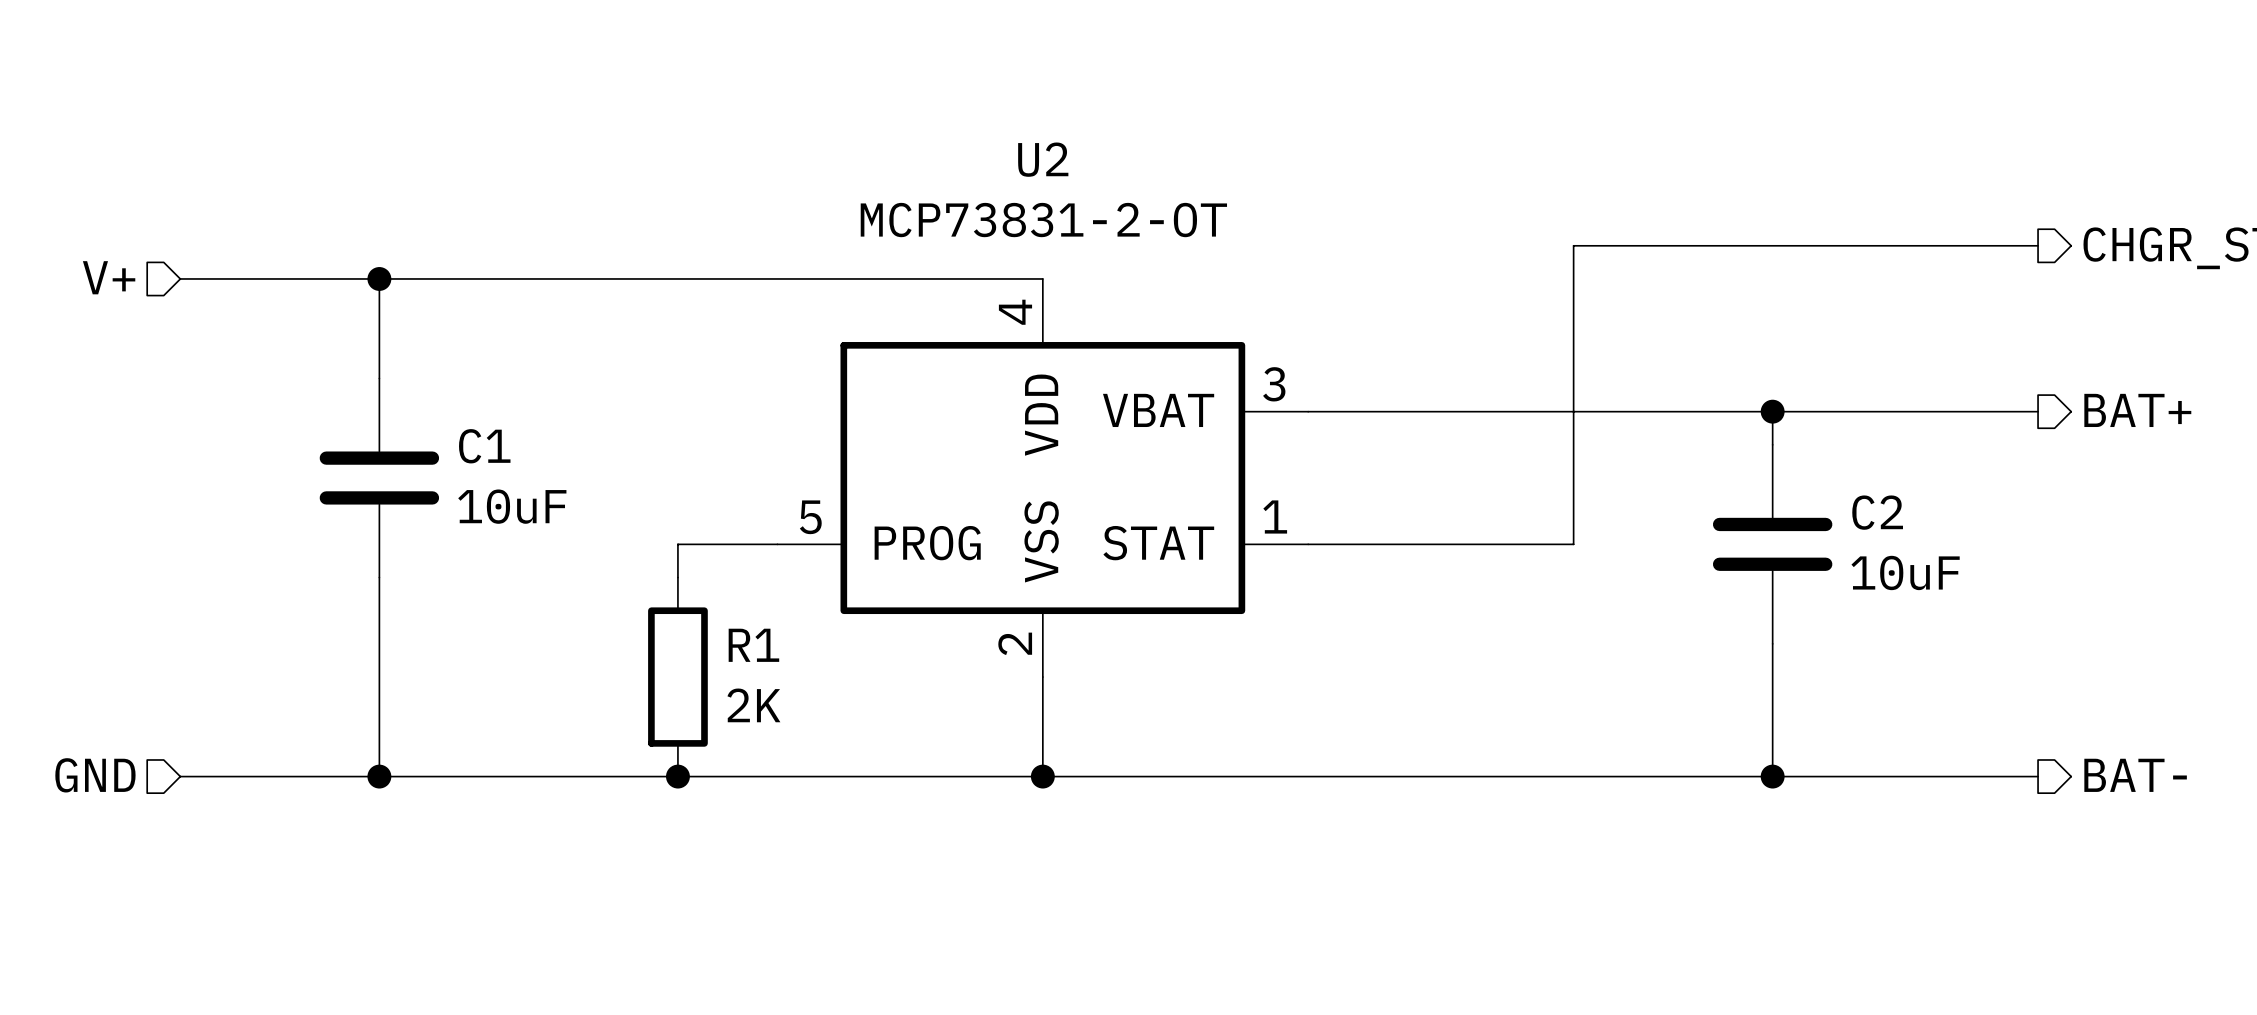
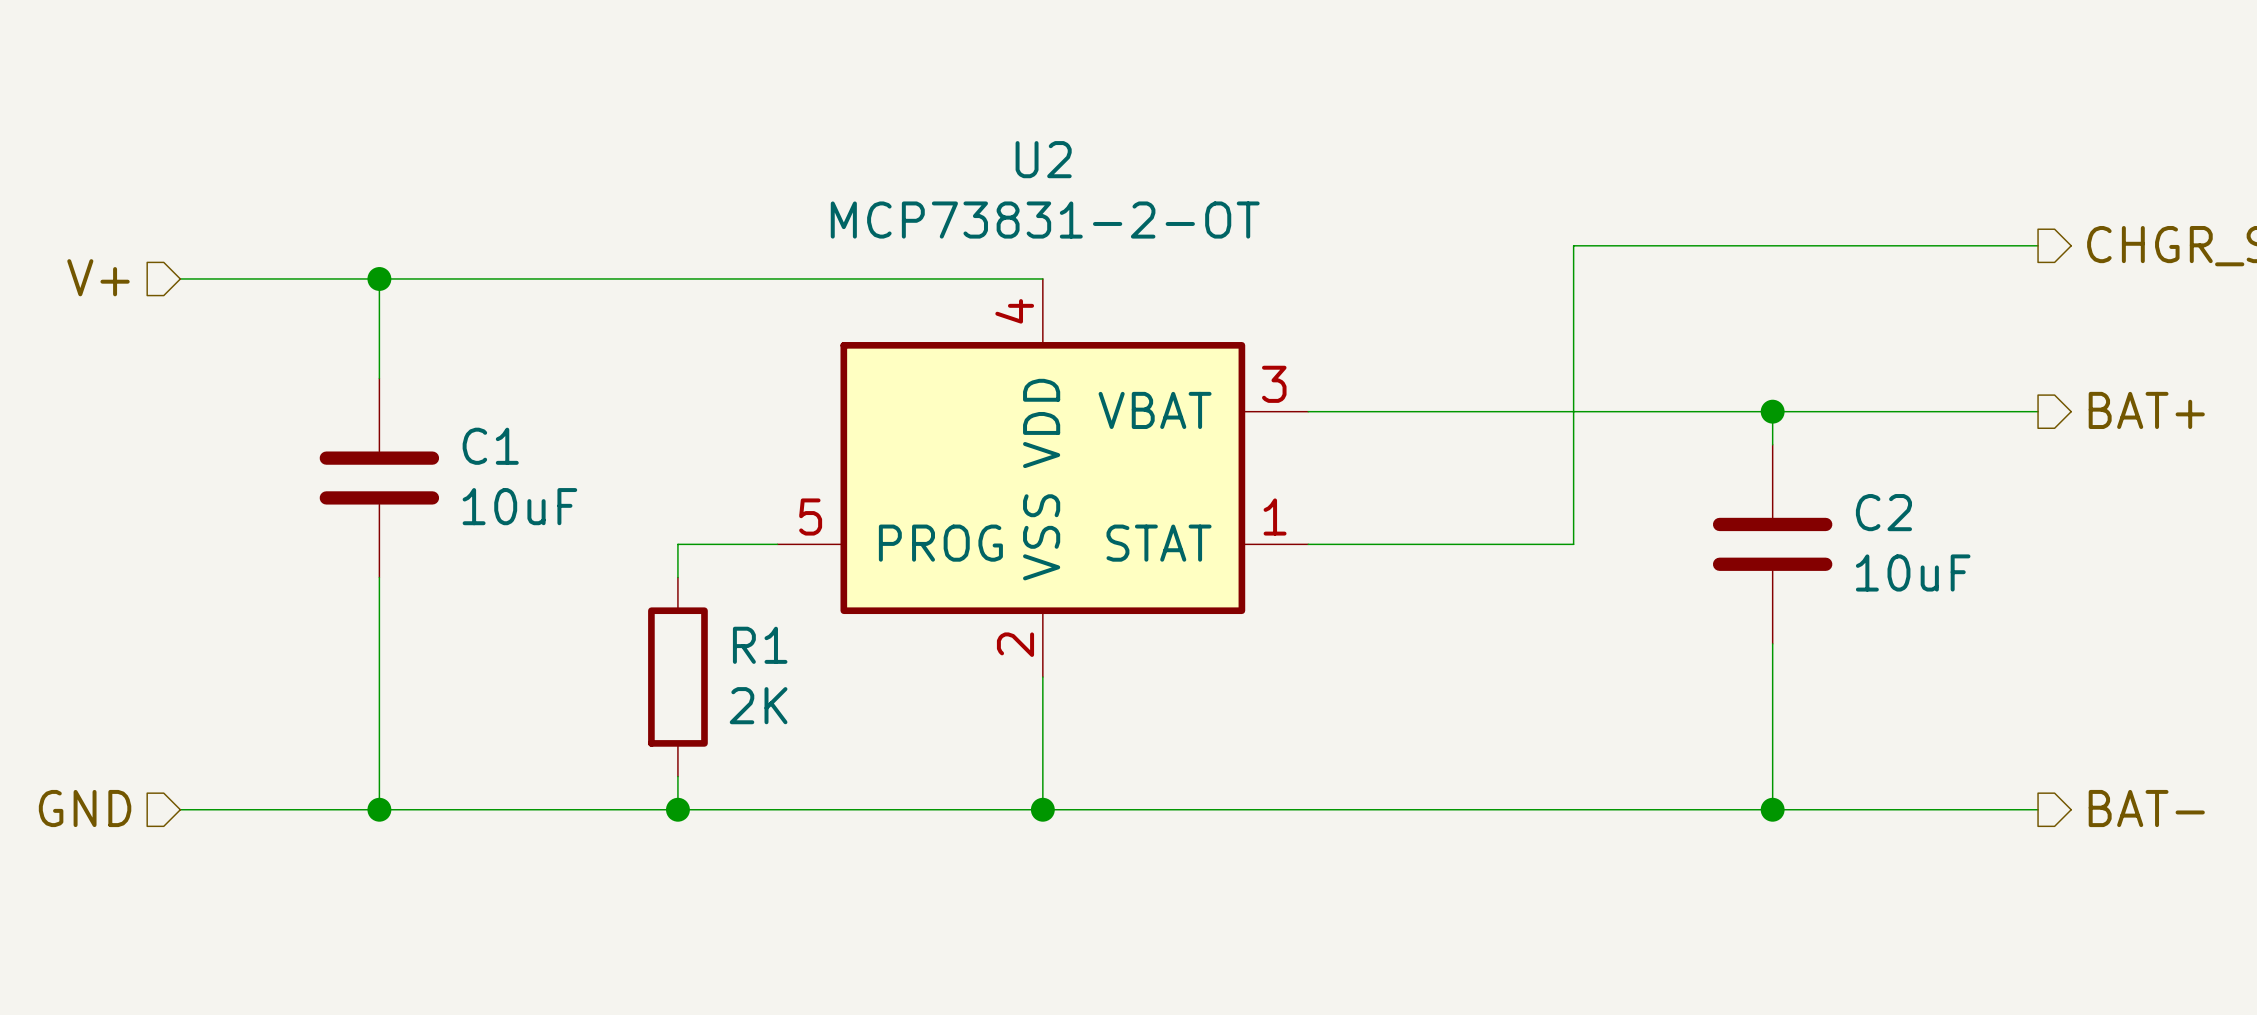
hierarchical label position: GND (95, 775) -> GND (85, 808)
hierarchical label position: BAT- (2135, 775) -> BAT- (2146, 808)
wire: (180, 776) (2038, 776) -> (180, 809) (2038, 809)
wire: none -> (379, 776) (379, 809)
junction position: (379, 776) -> (379, 809)
wire: none -> (677, 776) (677, 809)
junction position: (677, 776) -> (677, 809)
wire: none -> (1042, 776) (1042, 809)
junction position: (1042, 776) -> (1042, 809)
wire: none -> (1772, 776) (1772, 809)
junction position: (1772, 776) -> (1772, 809)

